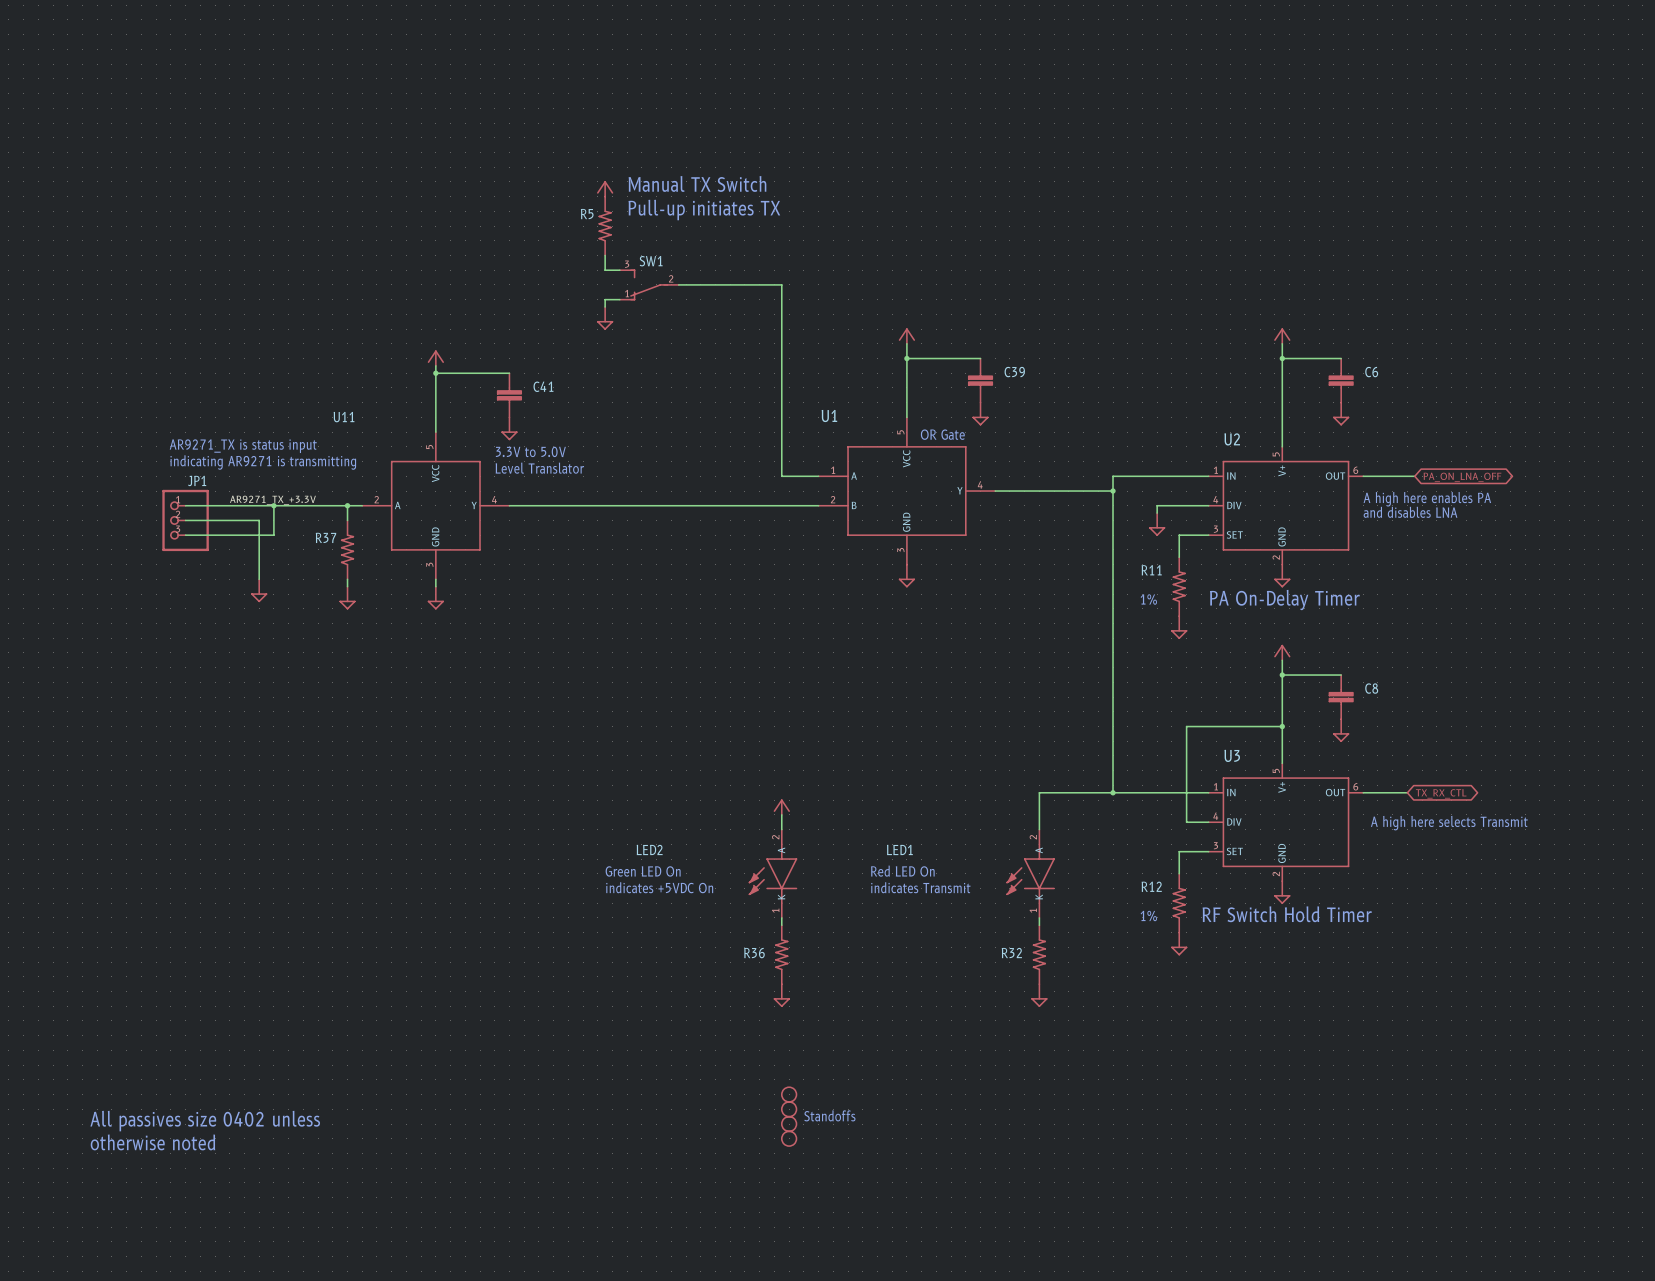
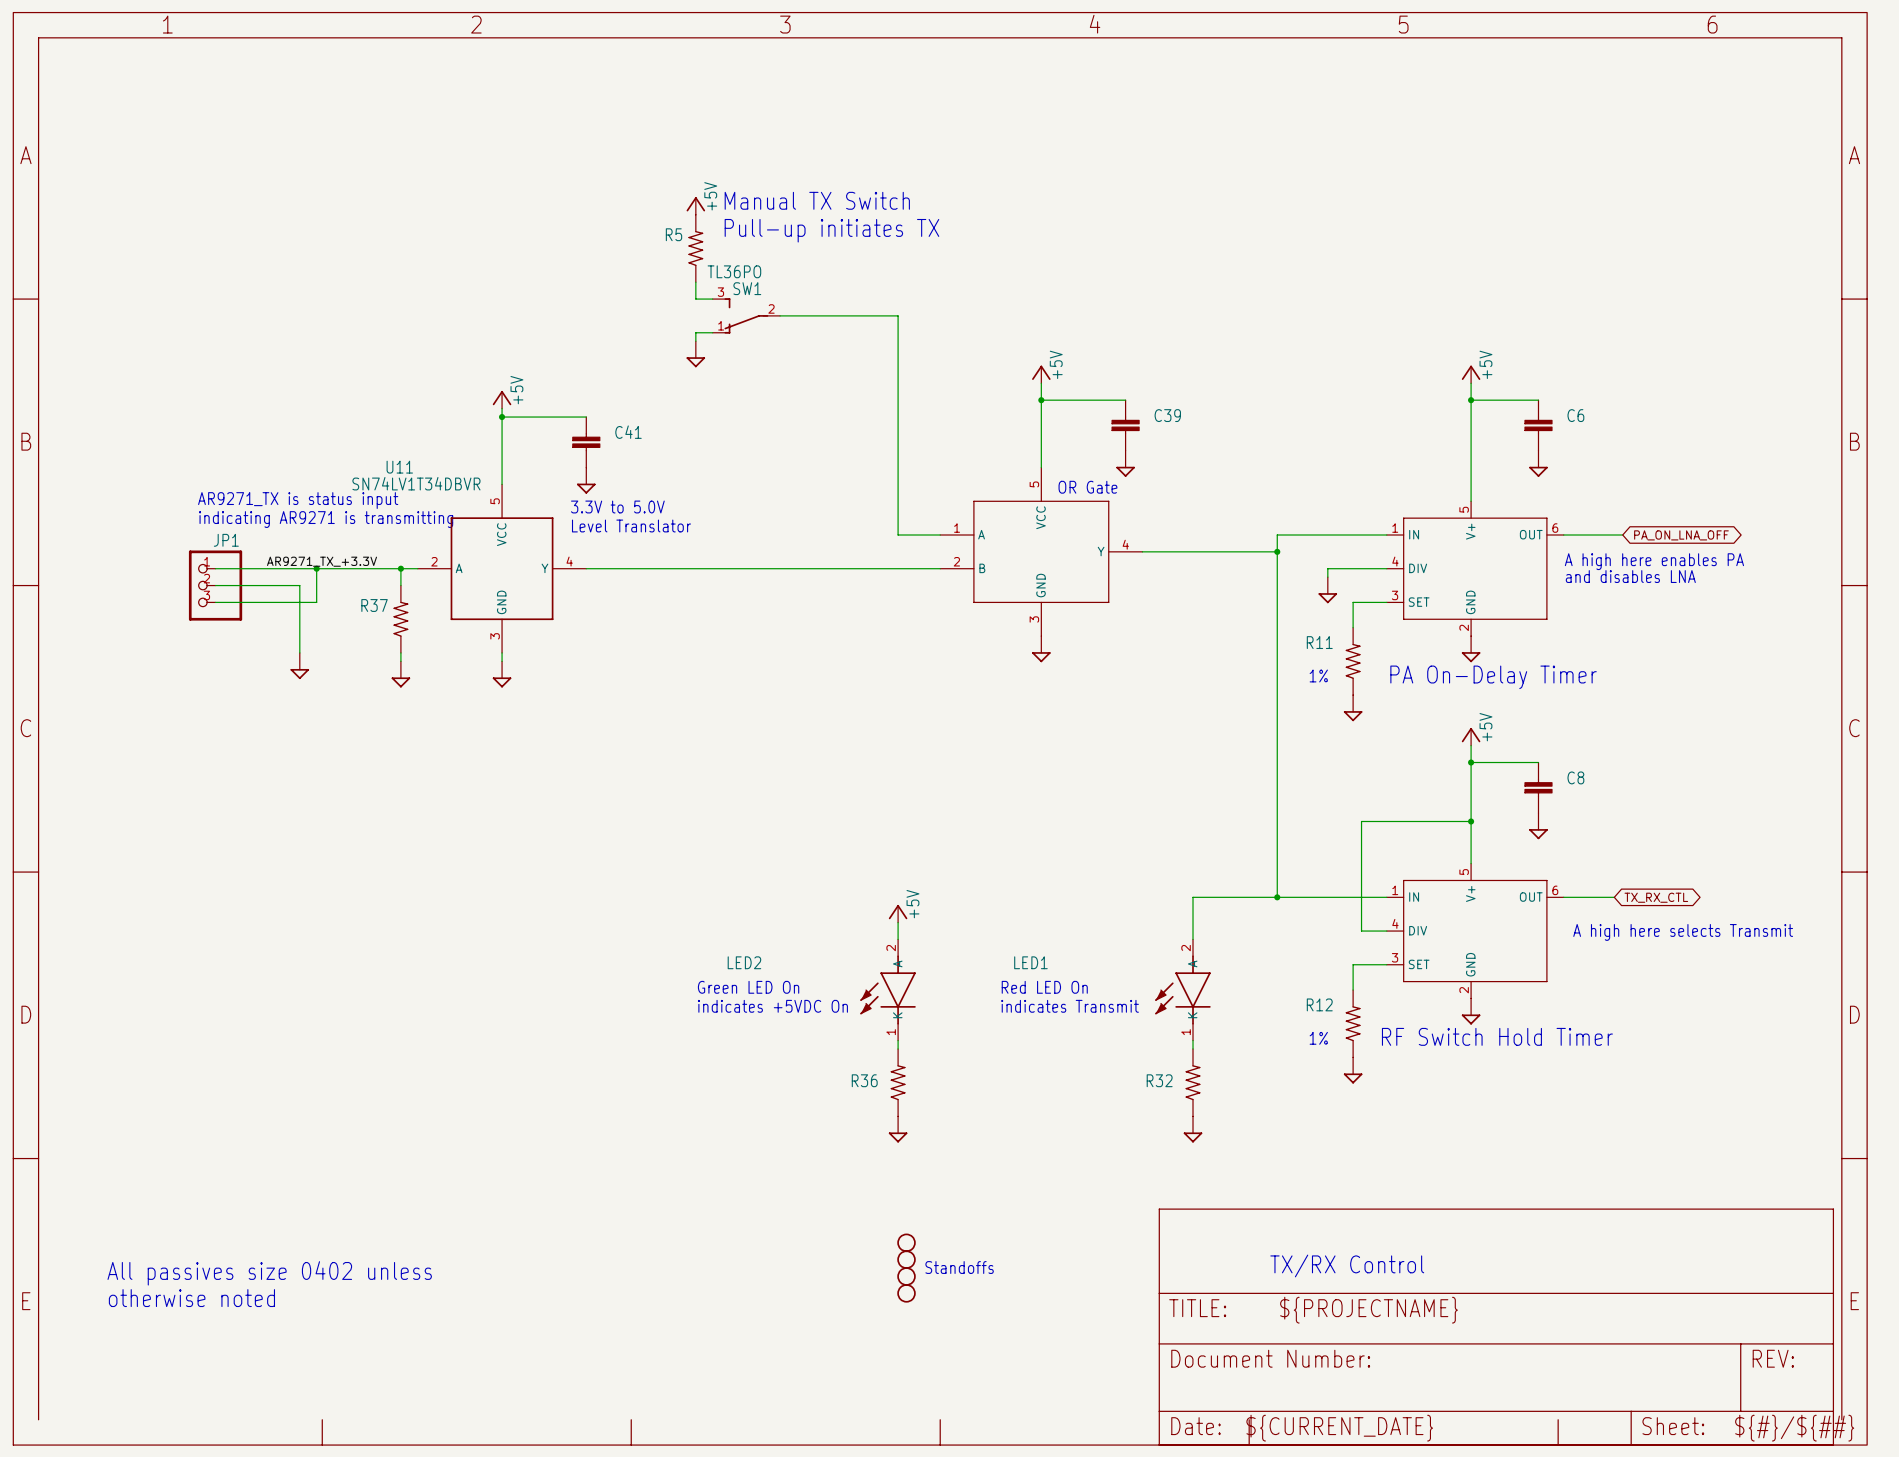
power symbol text: none -> +5V (710, 196)
SW1 value: none -> TL36PO (734, 271)
power symbol text: none -> +5V (1056, 364)
power symbol text: none -> +5V (1485, 364)
power symbol text: none -> +5V (516, 390)
U1 name: U1 (829, 416) -> none
U11 value: none -> SN74LV1T34DBVR (416, 483)
U2 name: U2 (1232, 439) -> none
power symbol text: none -> +5V (1485, 727)
power symbol: none -> (940, 728)
U3 name: U3 (1232, 755) -> none
power symbol text: none -> +5V (912, 904)
text: none -> TX/RX Control (1347, 1265)
power symbol: none -> (1496, 1327)

